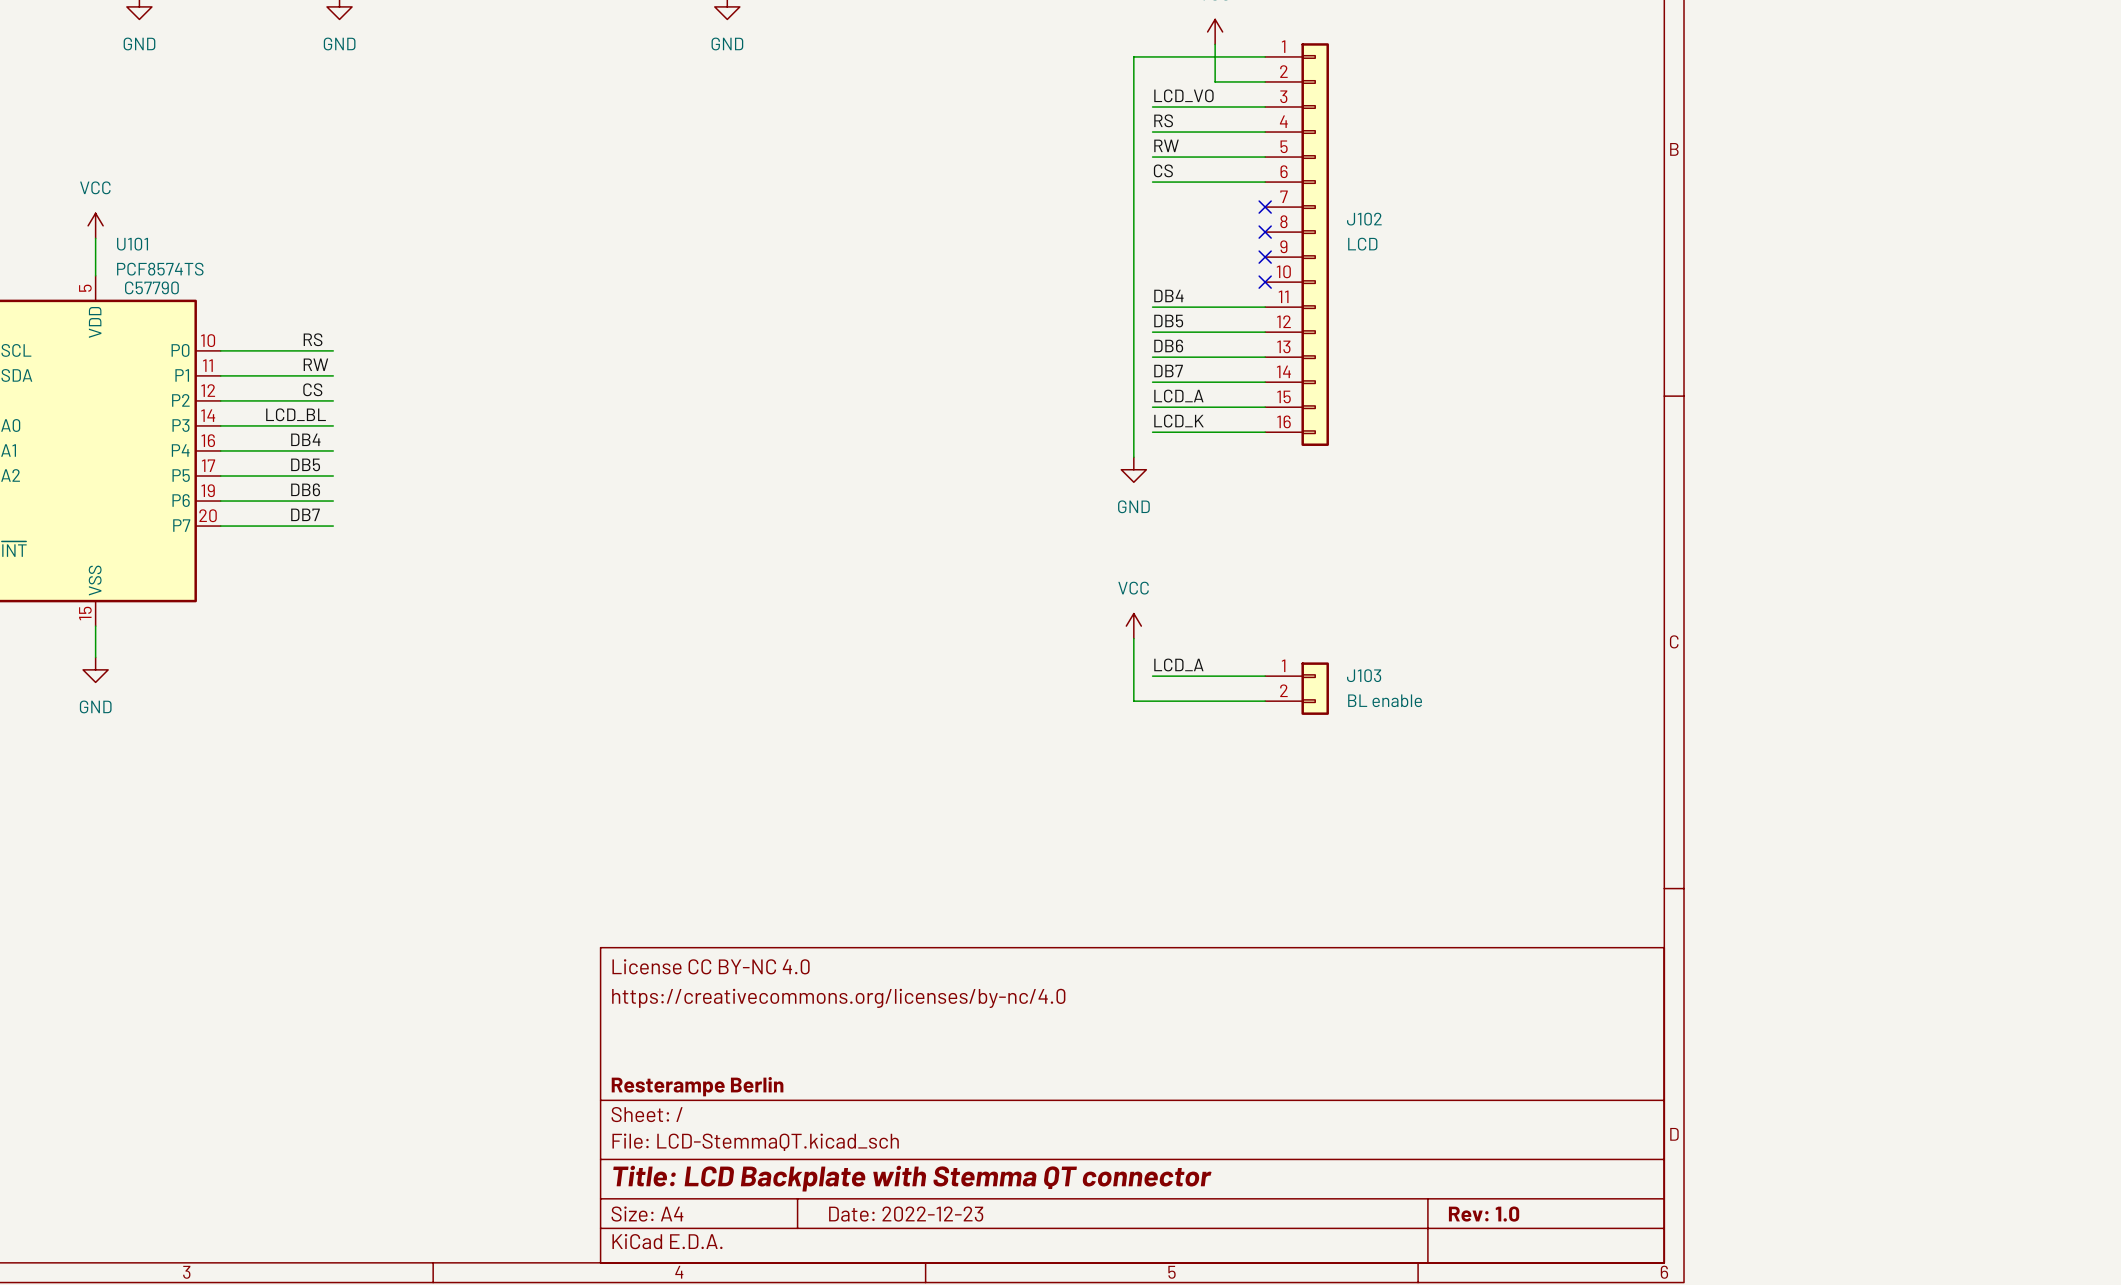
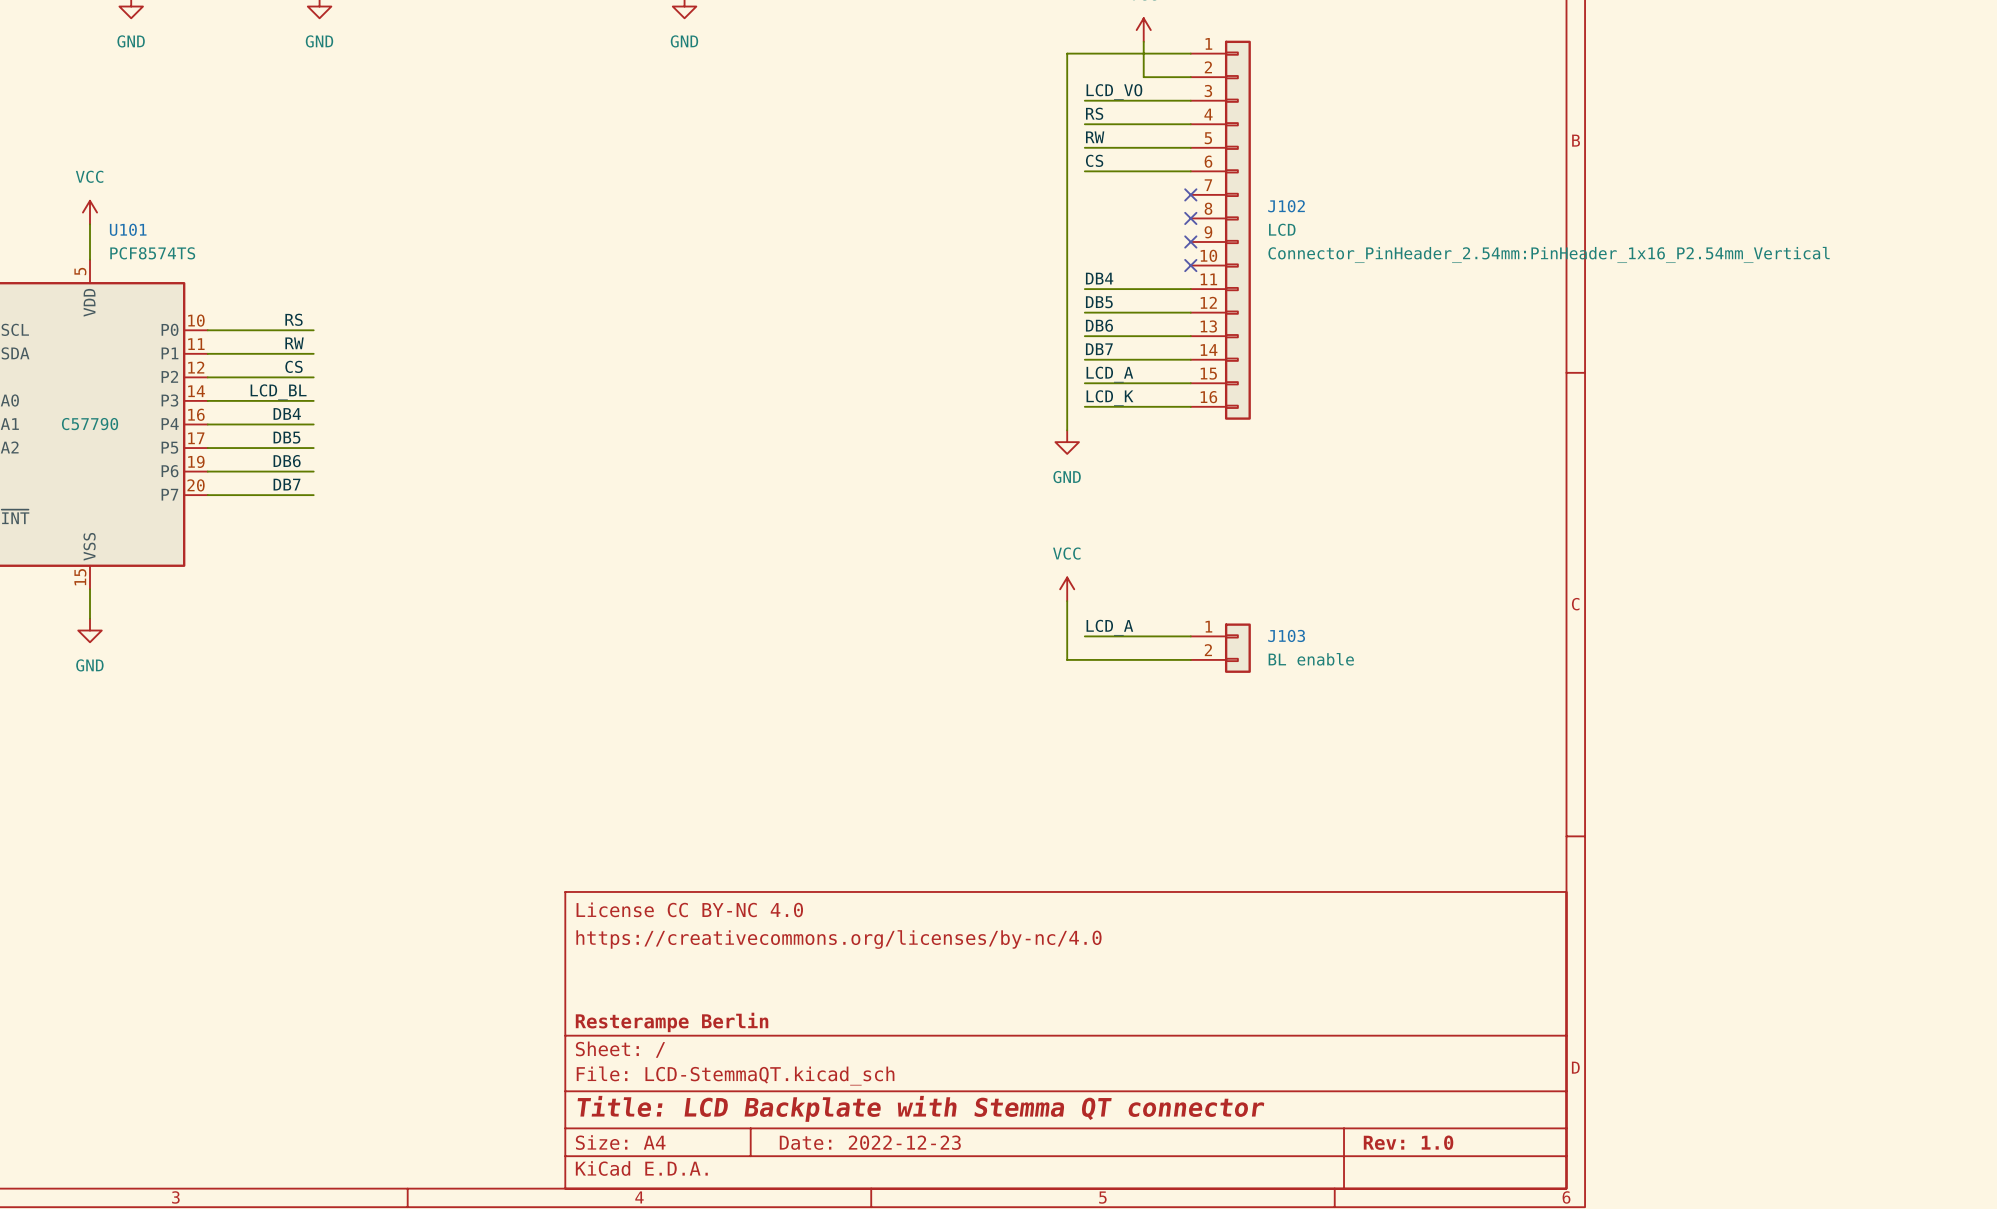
J102 text: none -> Connector_PinHeader_2.54mm:PinHeader_1x16_P2.54mm_Vertical (1549, 254)
U101 text position: C57790 (151, 287) -> C57790 (90, 424)

